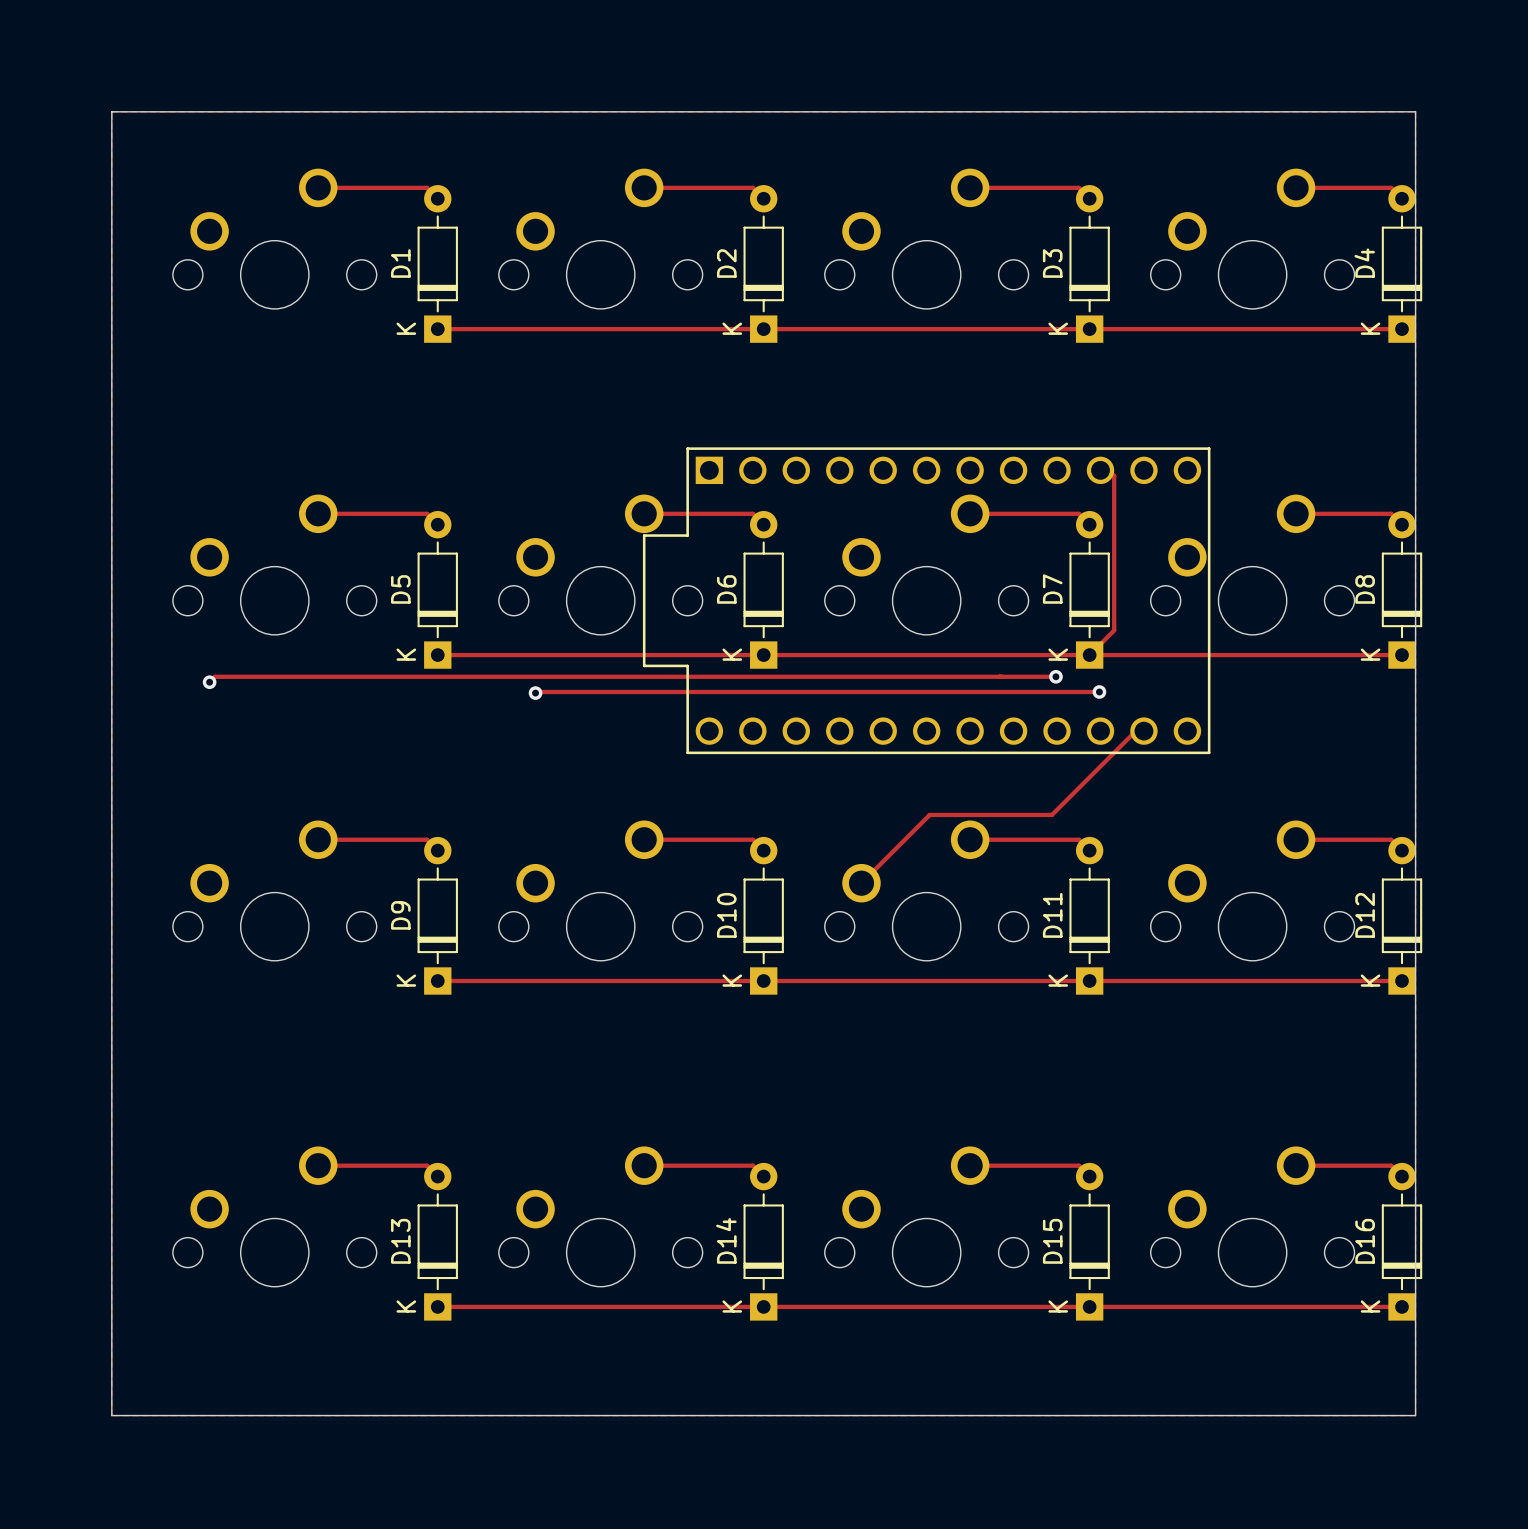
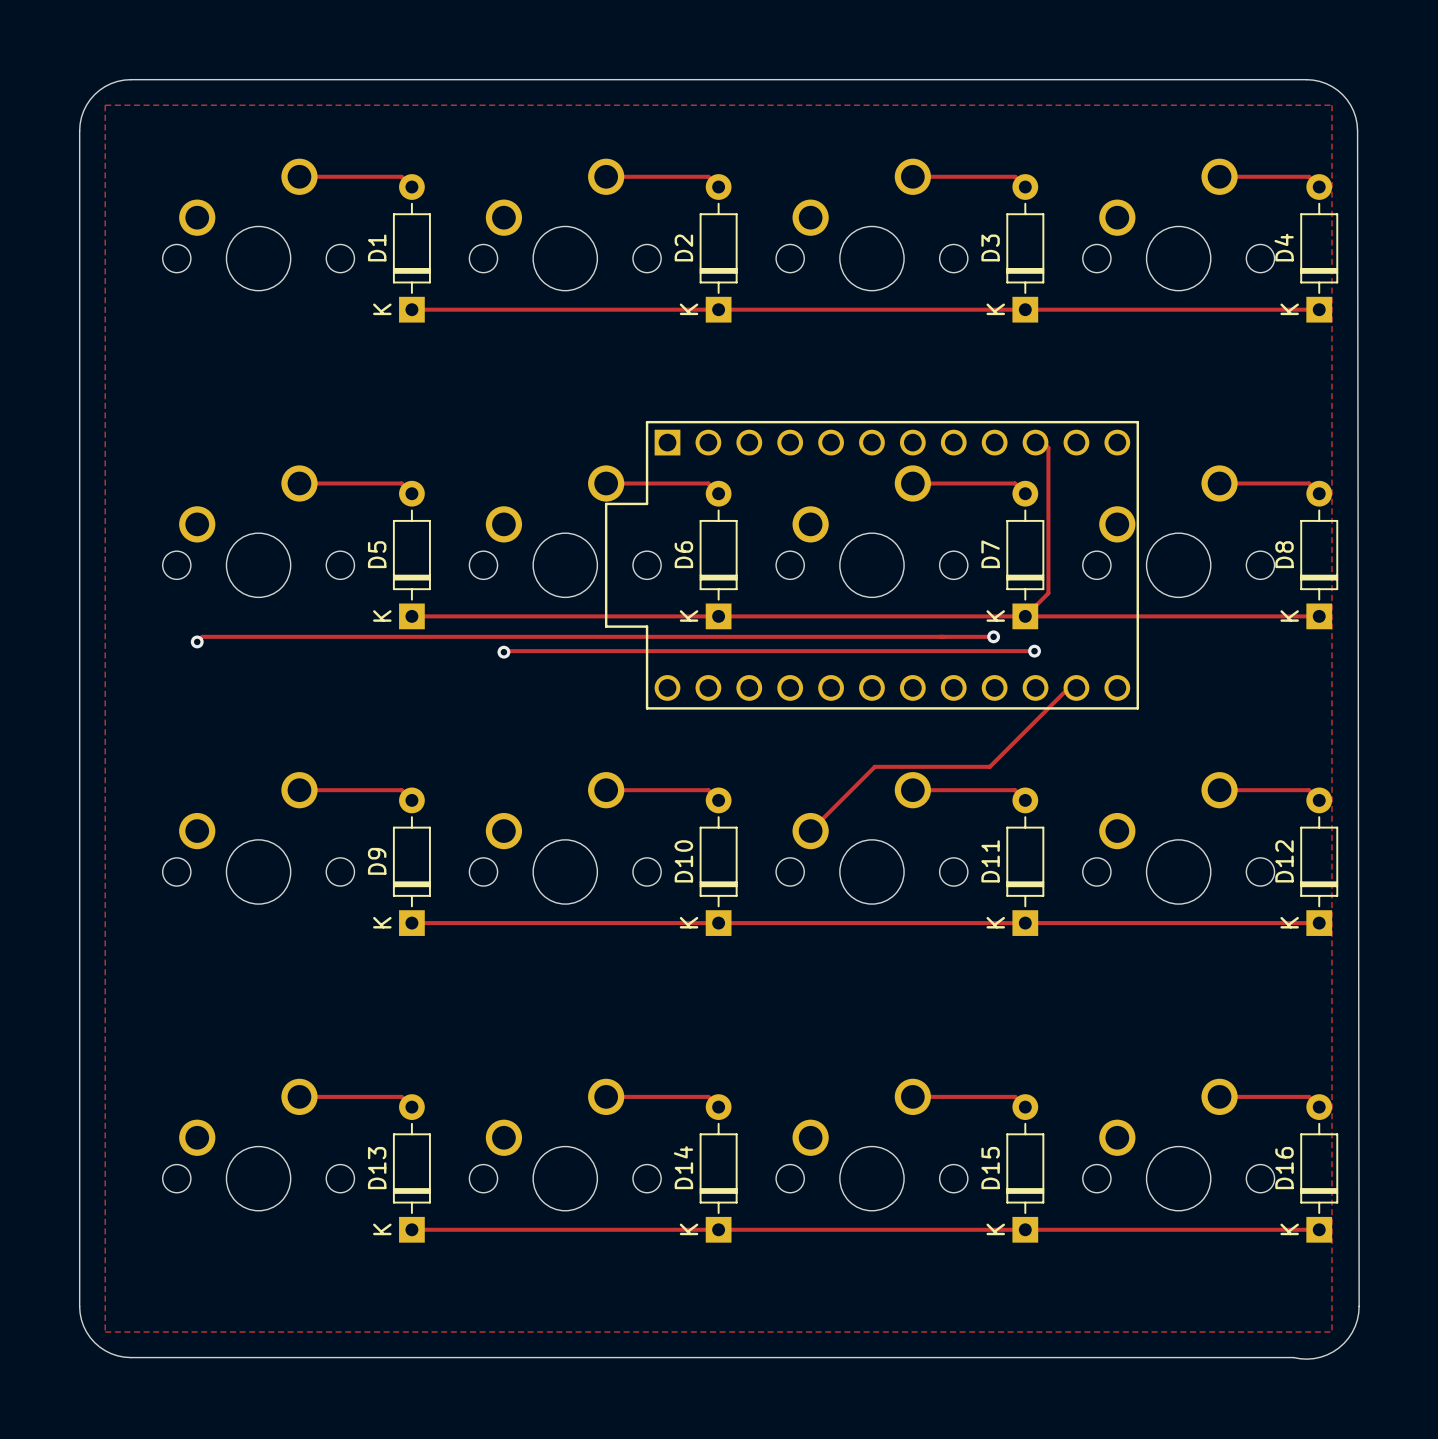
board edge: (111, 111) (111, 1415) (1415, 1415) (1415, 111) (111, 111) -> (130, 79) (111, 83) (94, 94) (83, 111) (79, 130) (79, 1306) (83, 1326) (94, 1342) (111, 1353) (130, 1357) (1293, 1357) (1307, 1359) (1327, 1354) (1343, 1343) (1355, 1326) (1359, 1306) (1357, 130) (1353, 111) (1342, 94) (1326, 83) (1306, 79) (130, 79)

